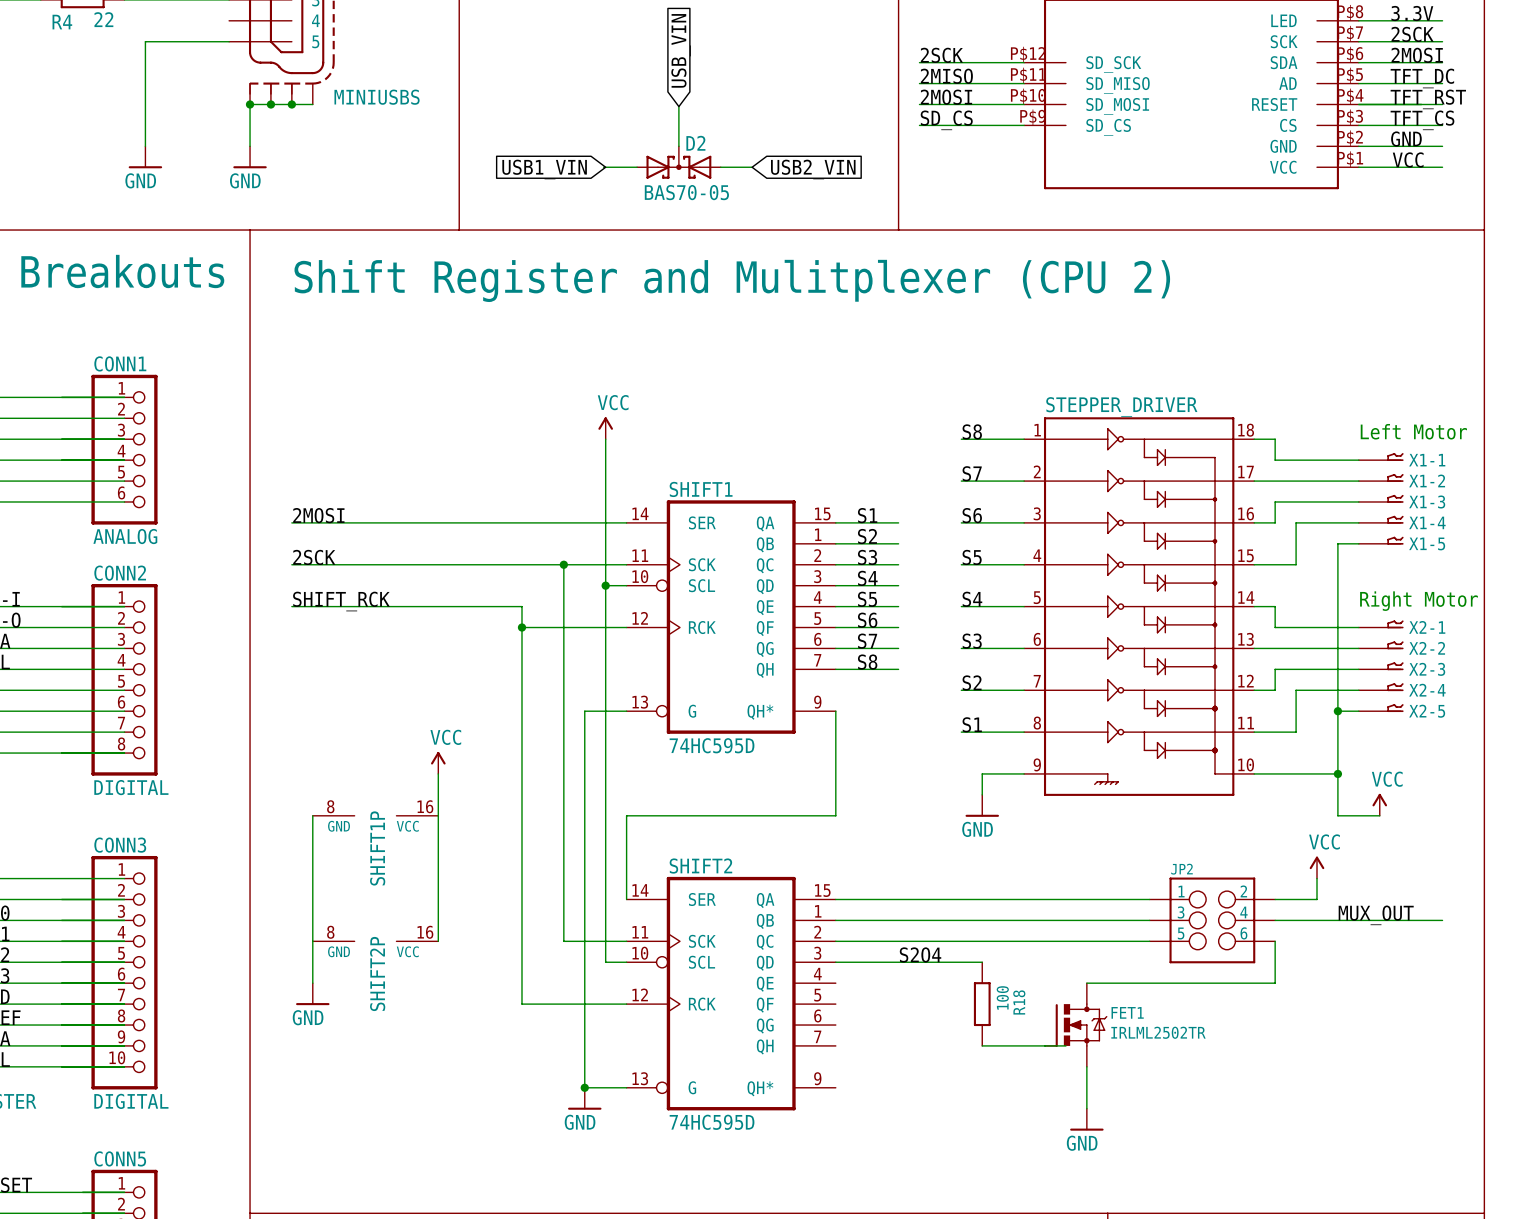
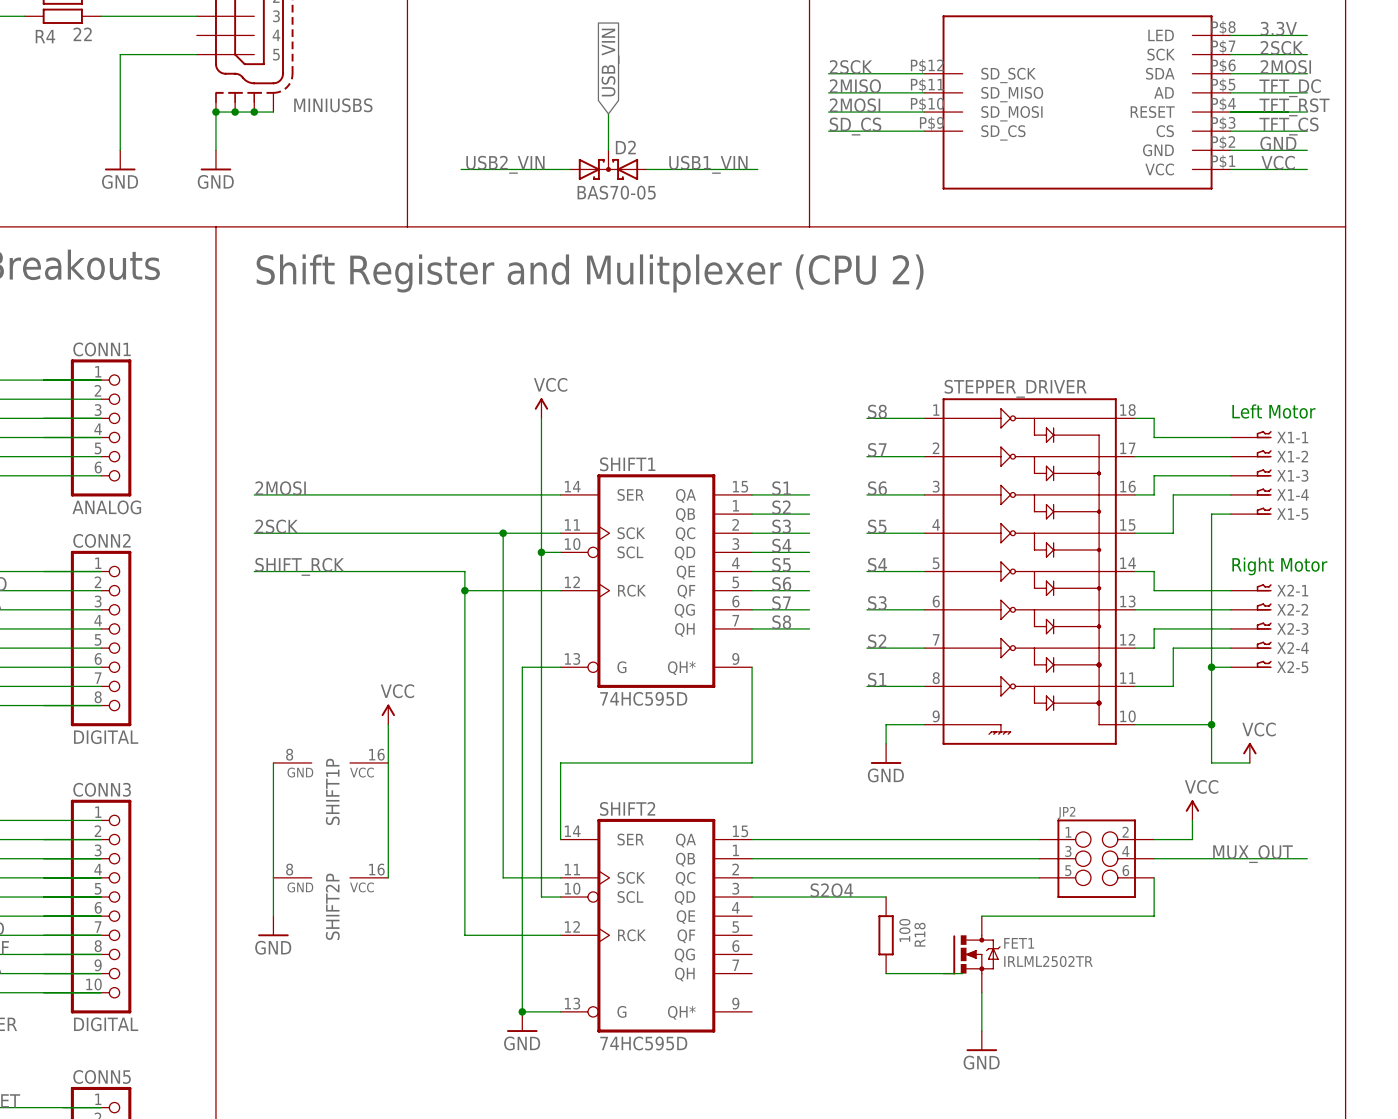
label: none -> USB2_VIN (505, 164)
label: none -> USB1_VIN (708, 164)
wire: none -> (461, 169) (539, 169)
wire: none -> (675, 169) (757, 169)
global label: USB1_VIN (544, 169) -> none
global label: USB2_VIN (813, 169) -> none

